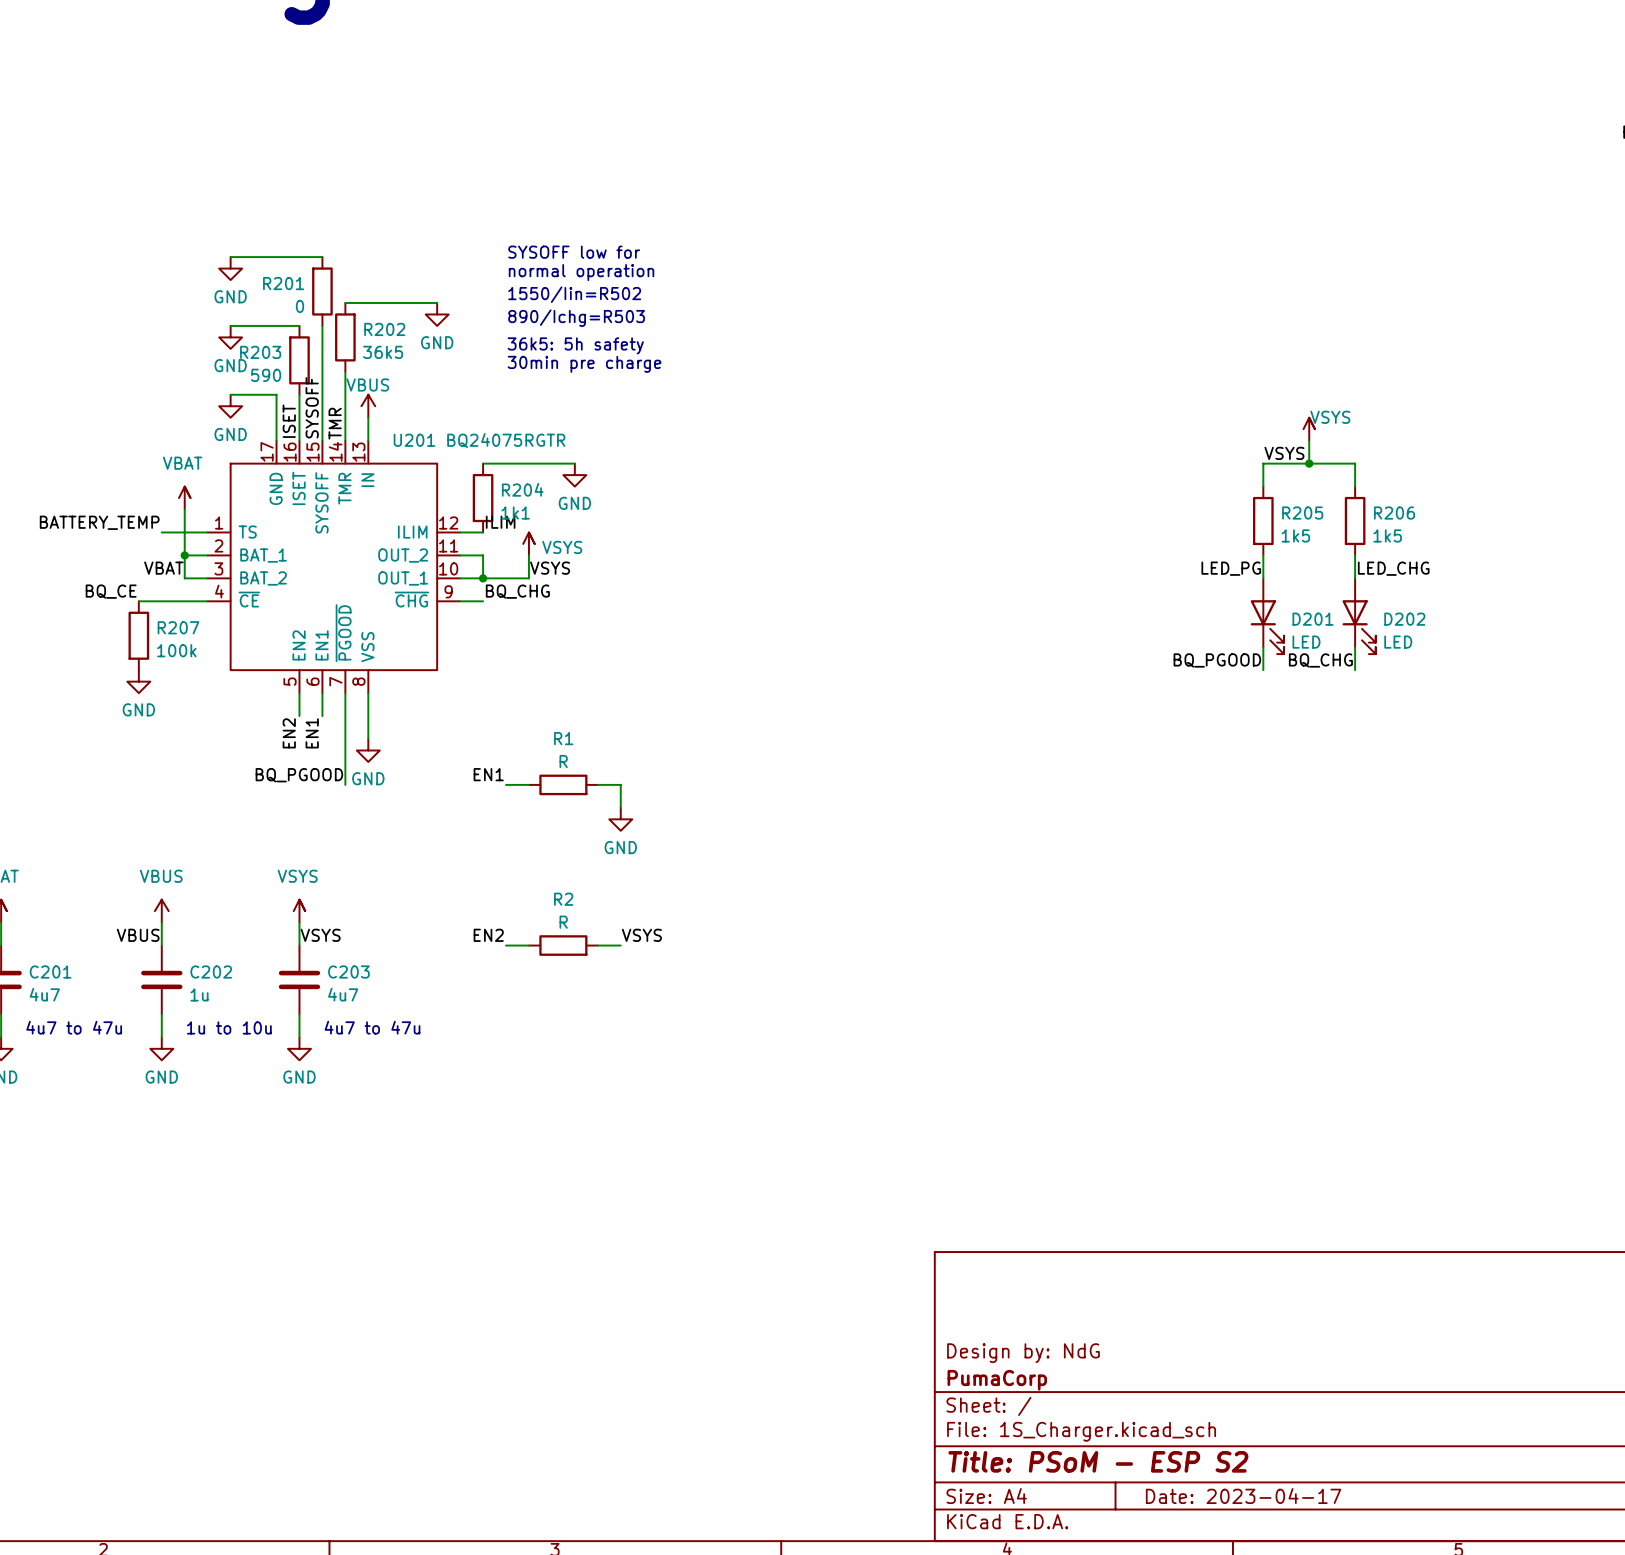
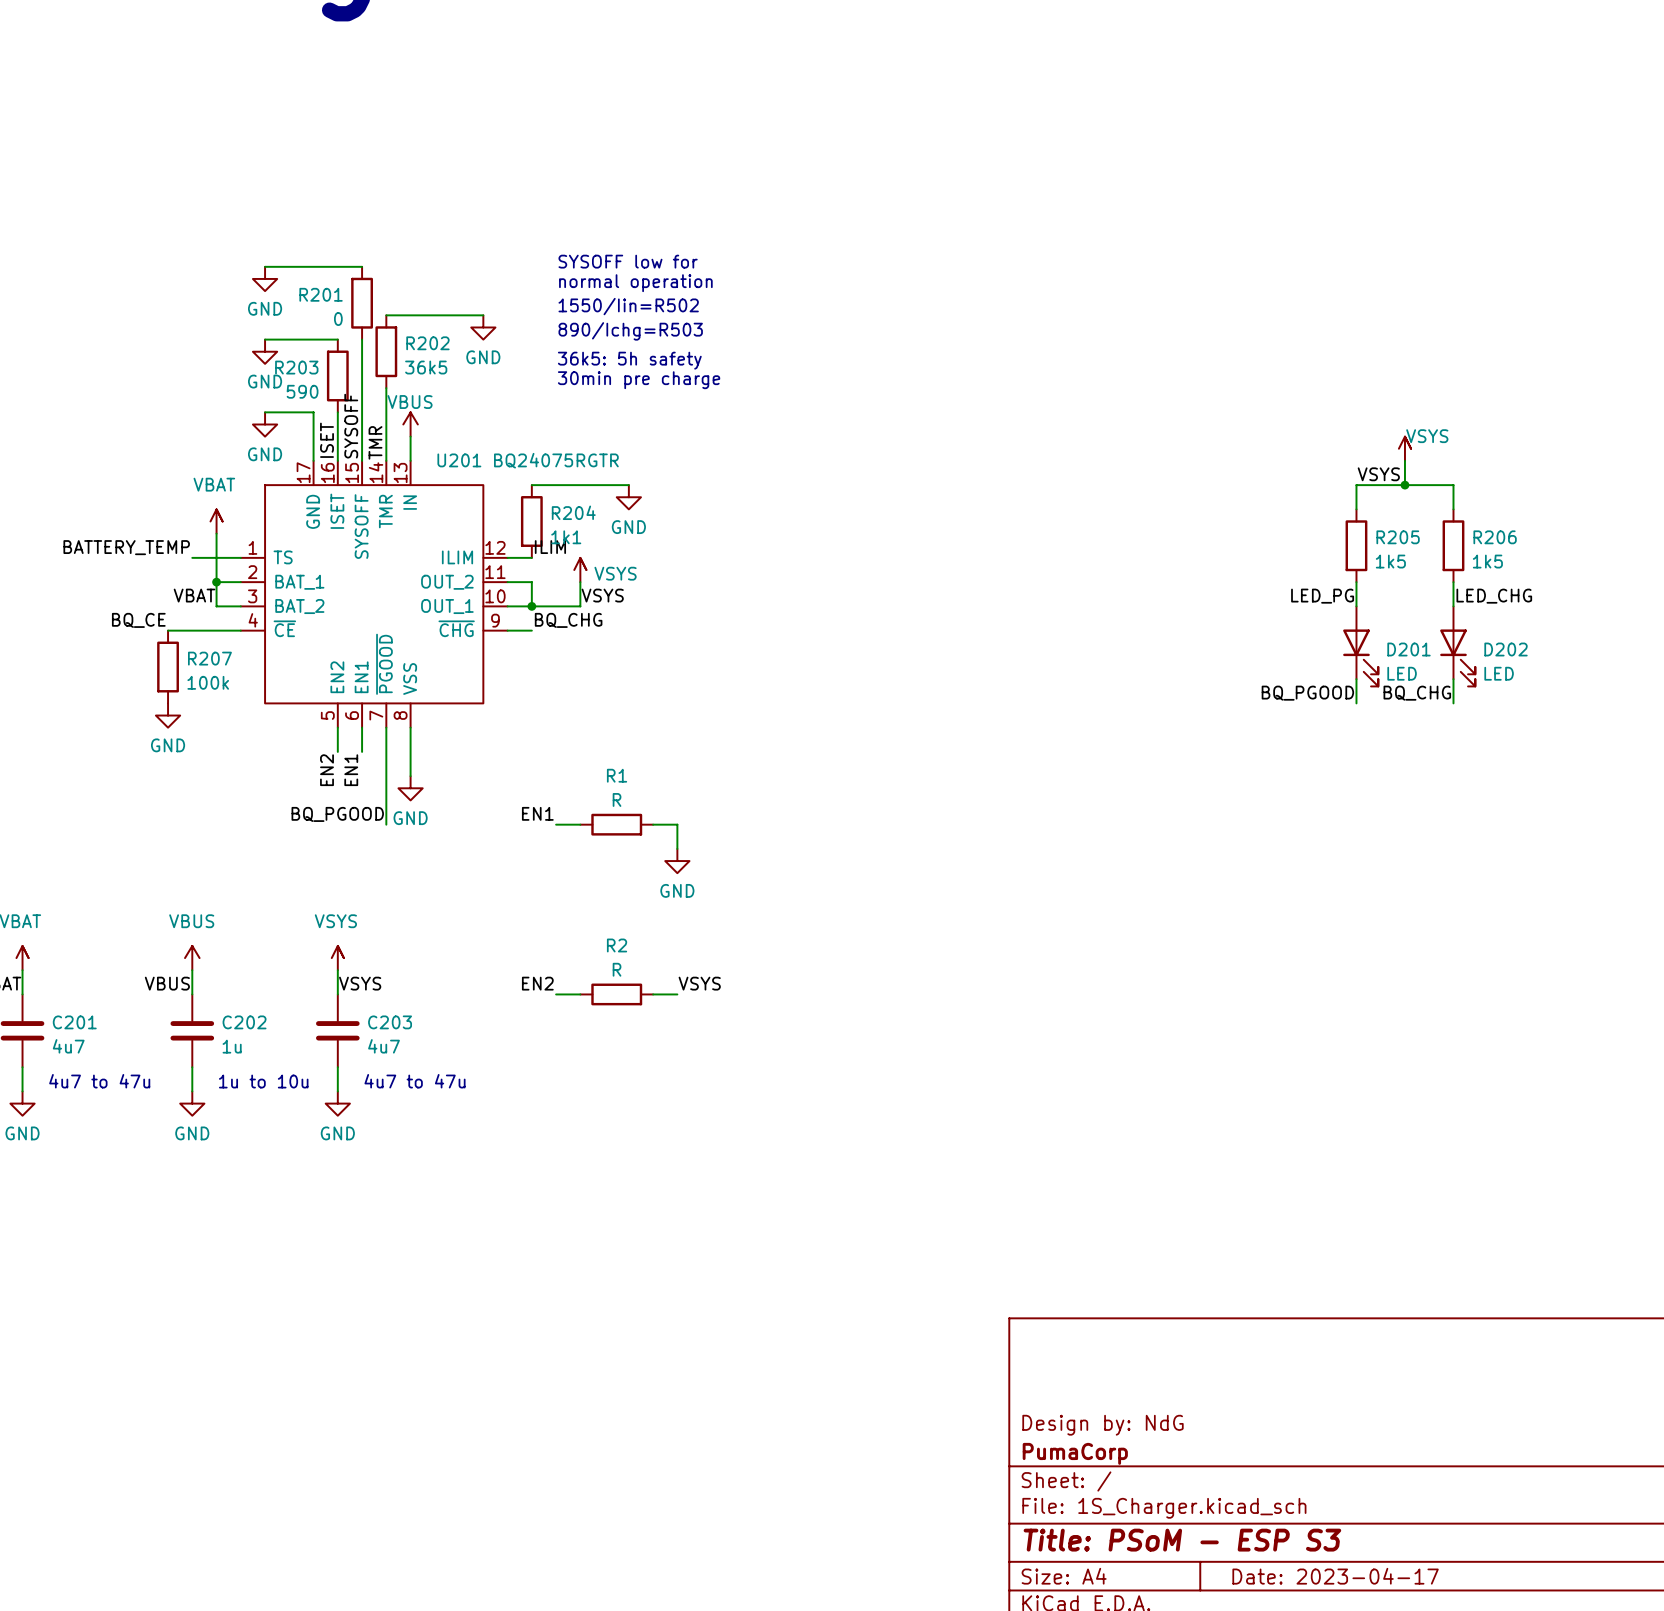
title block: Title: PSoM - ESP S2 (1098, 1461) -> Title: PSoM - ESP S3 (1182, 1540)

